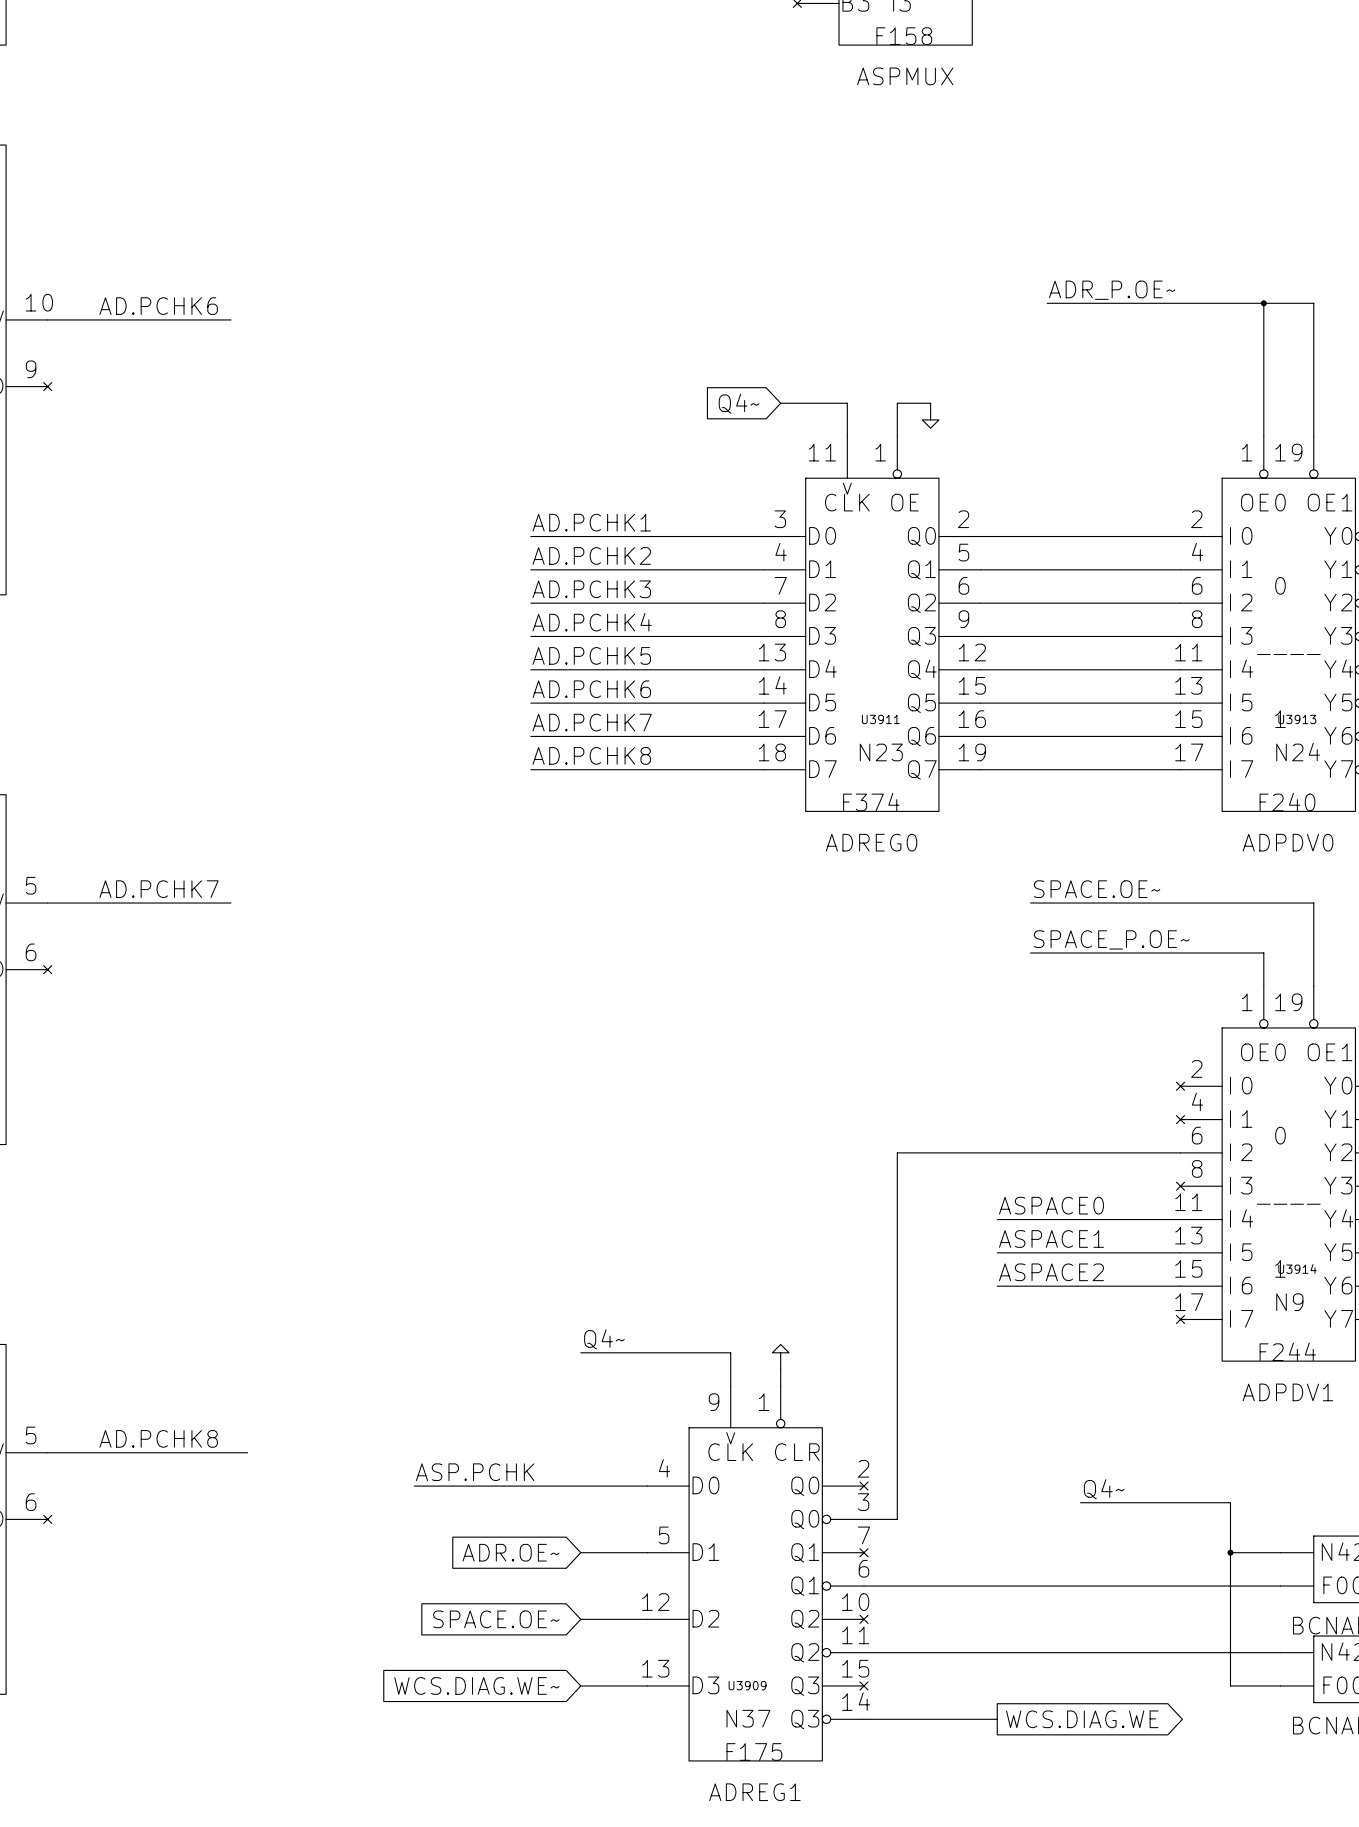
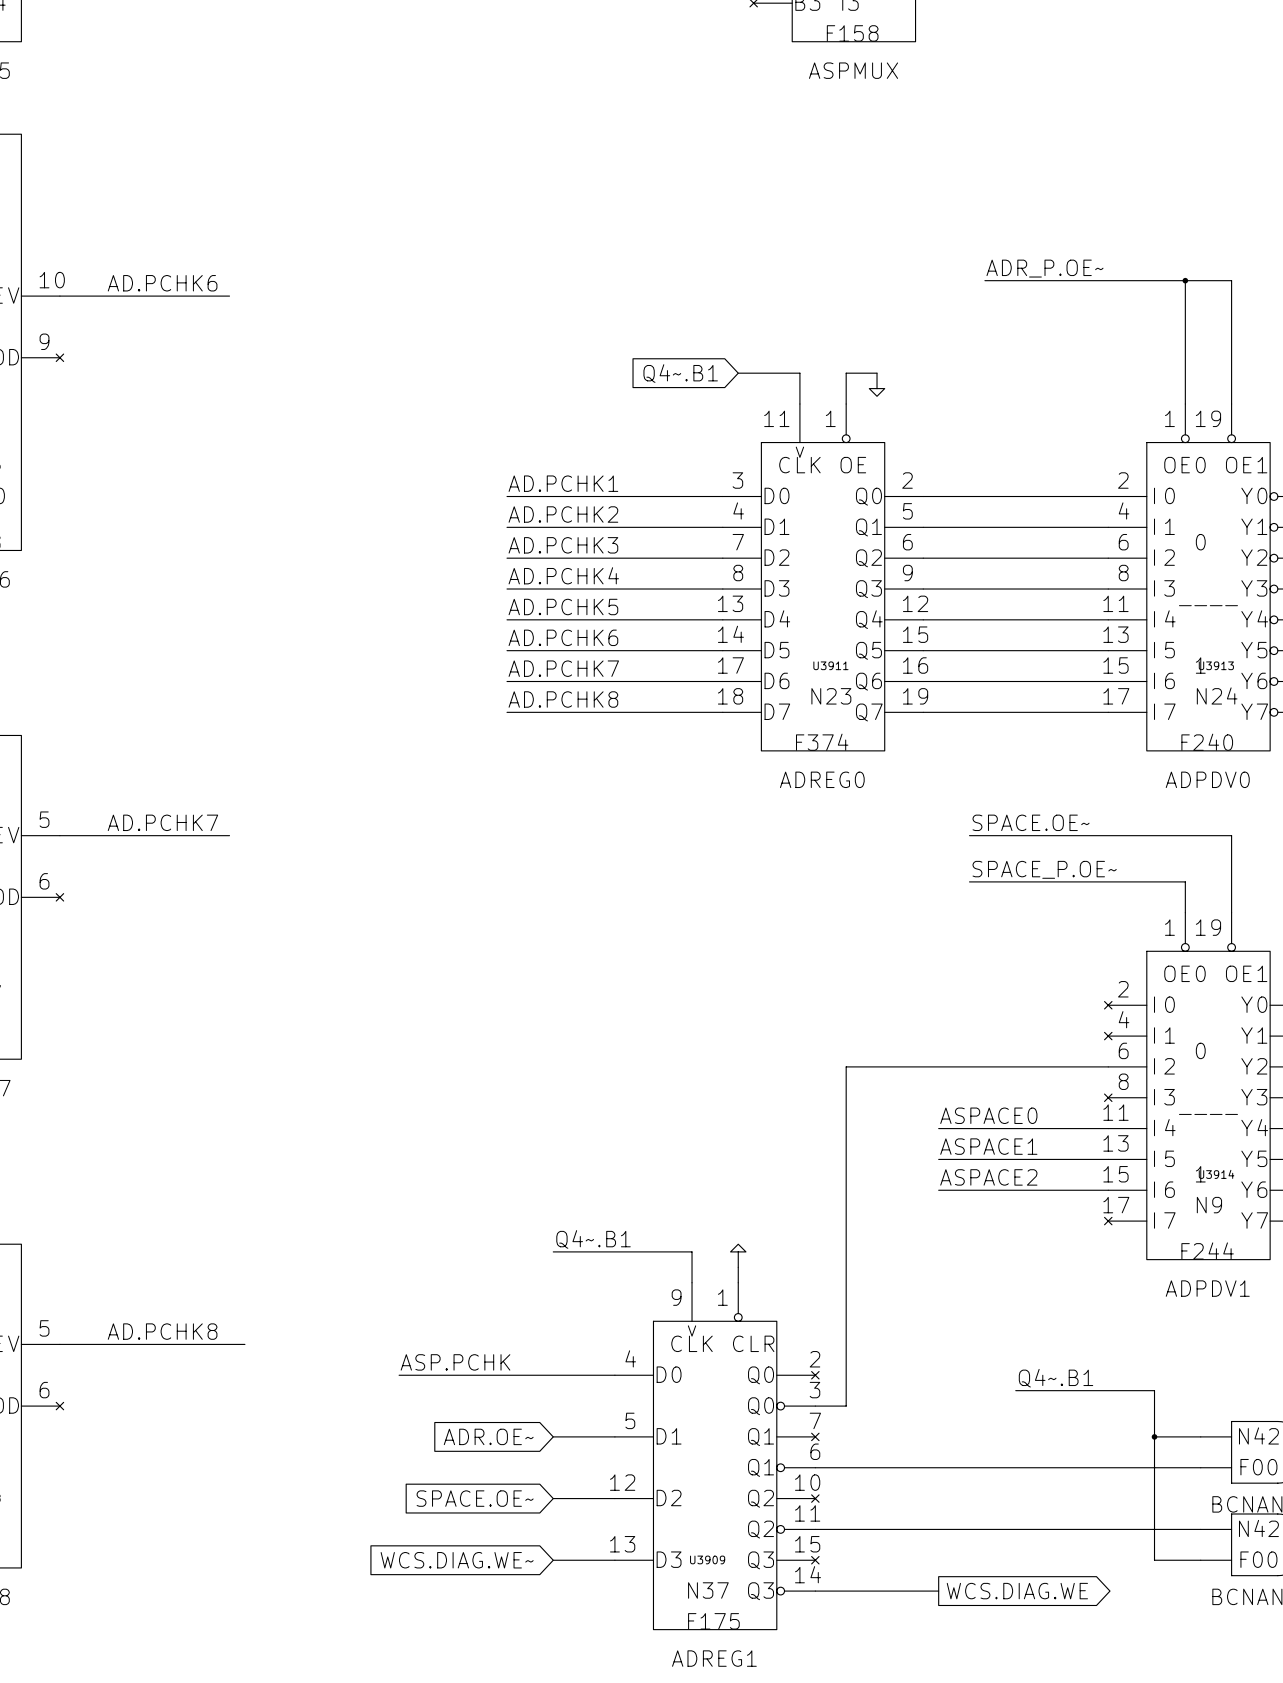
global label: Q4~ (739, 403) -> Q4~.B1 (680, 373)
label: Q4~ (604, 1339) -> Q4~.B1 (593, 1239)
label: Q4~ (1104, 1489) -> Q4~.B1 (1056, 1378)

